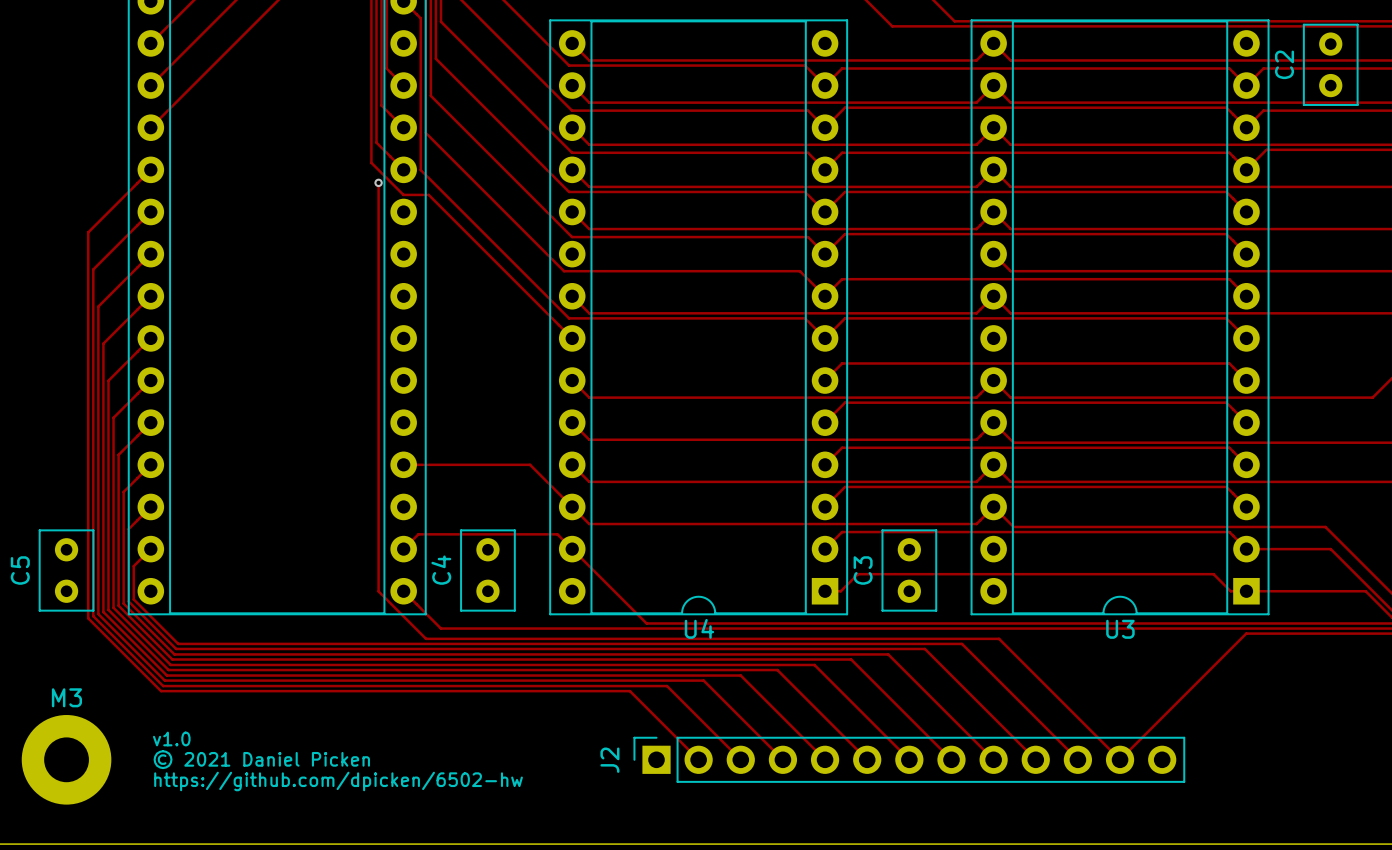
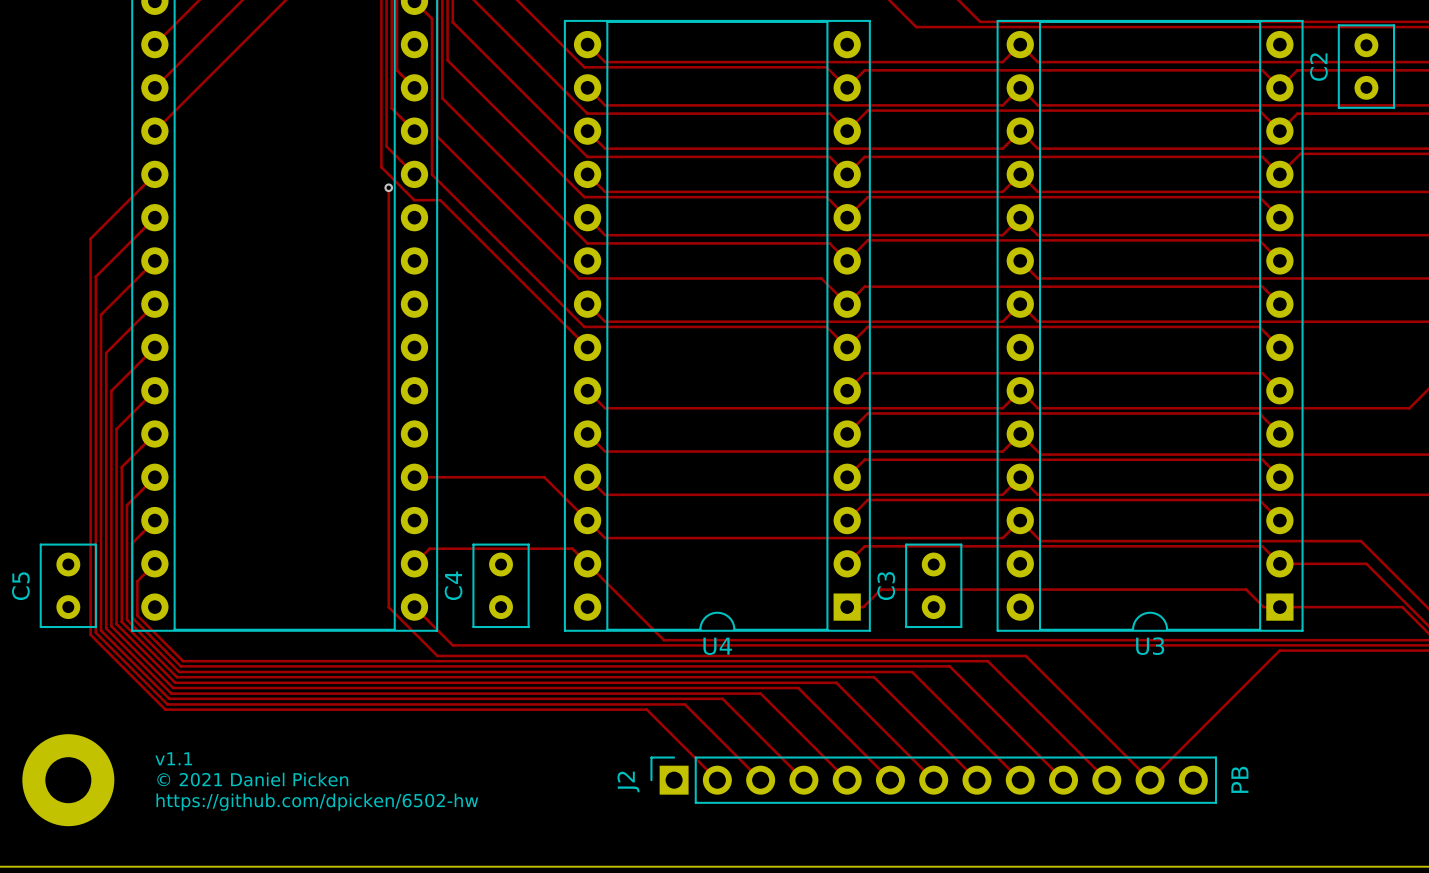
M3 name: M3 (66, 697) -> none
text: v1.0 (171, 738) -> v1.1 (173, 758)
J2 value: none -> PB (1239, 779)

